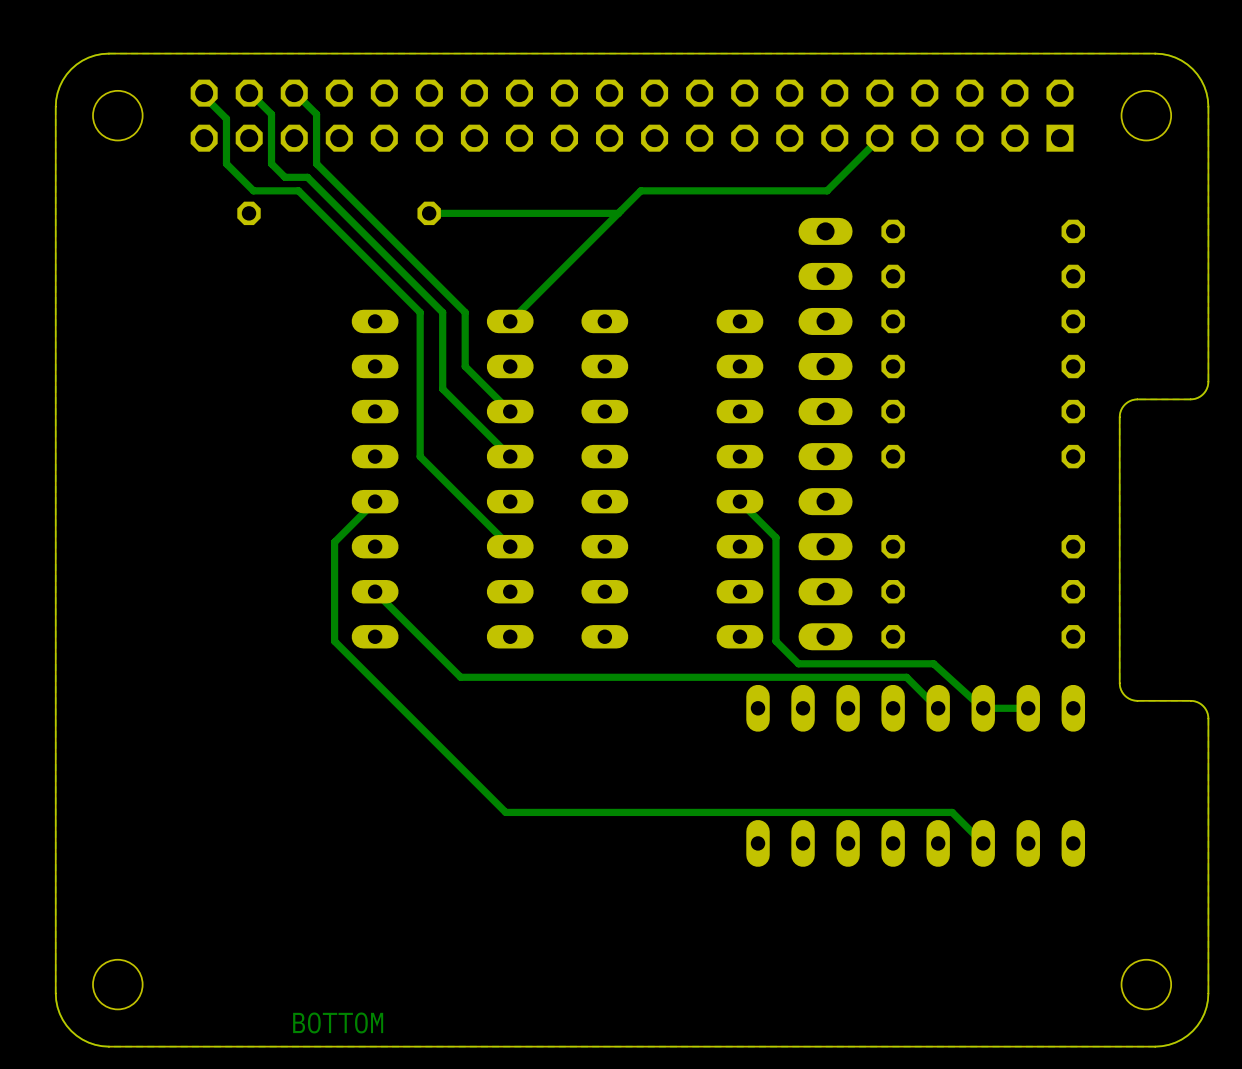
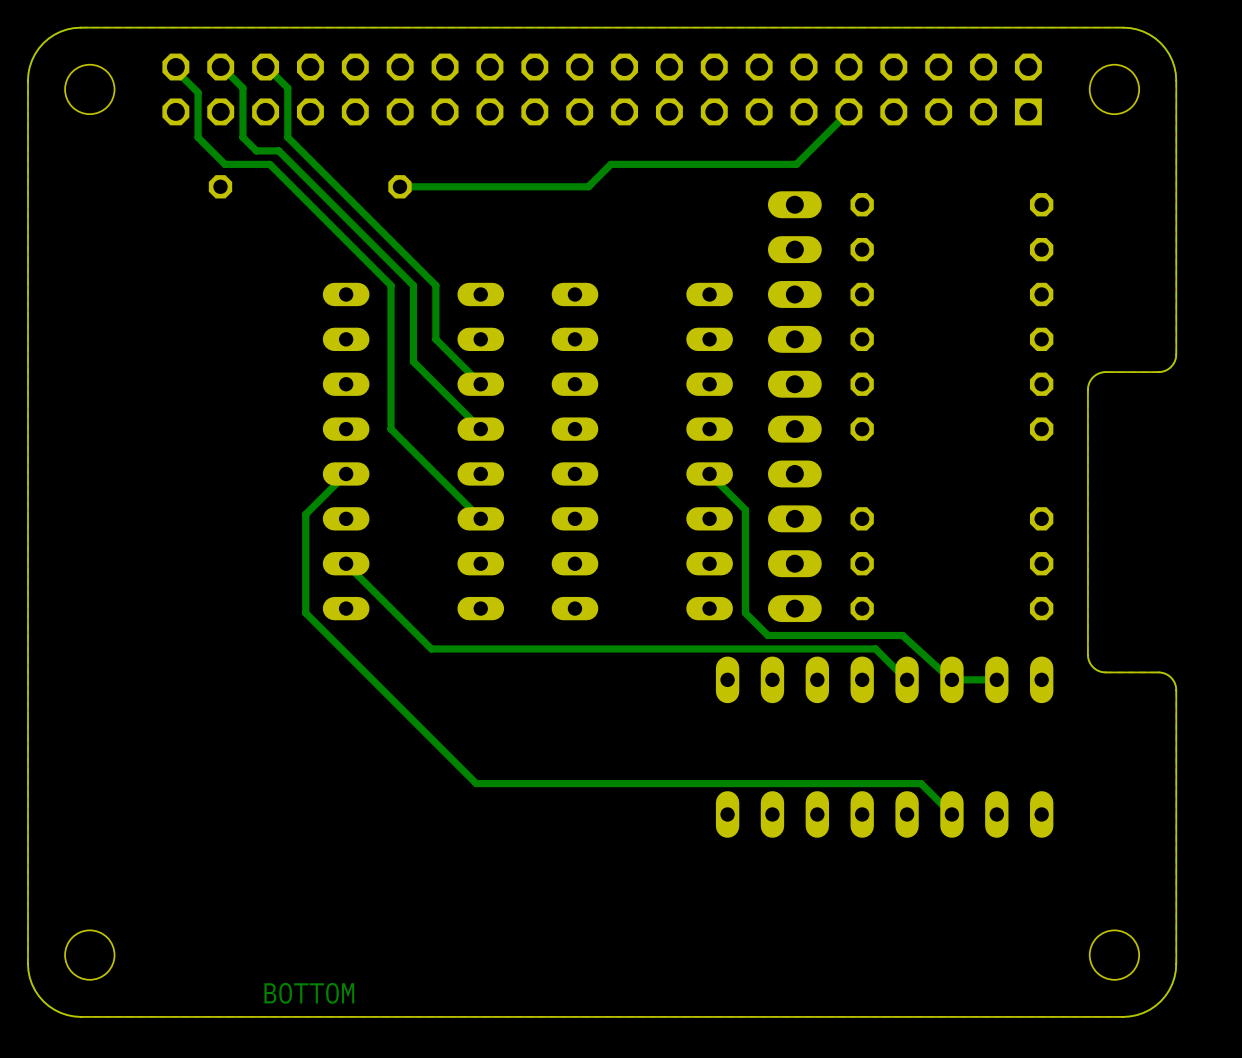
track: (618, 213) (510, 321) -> none

